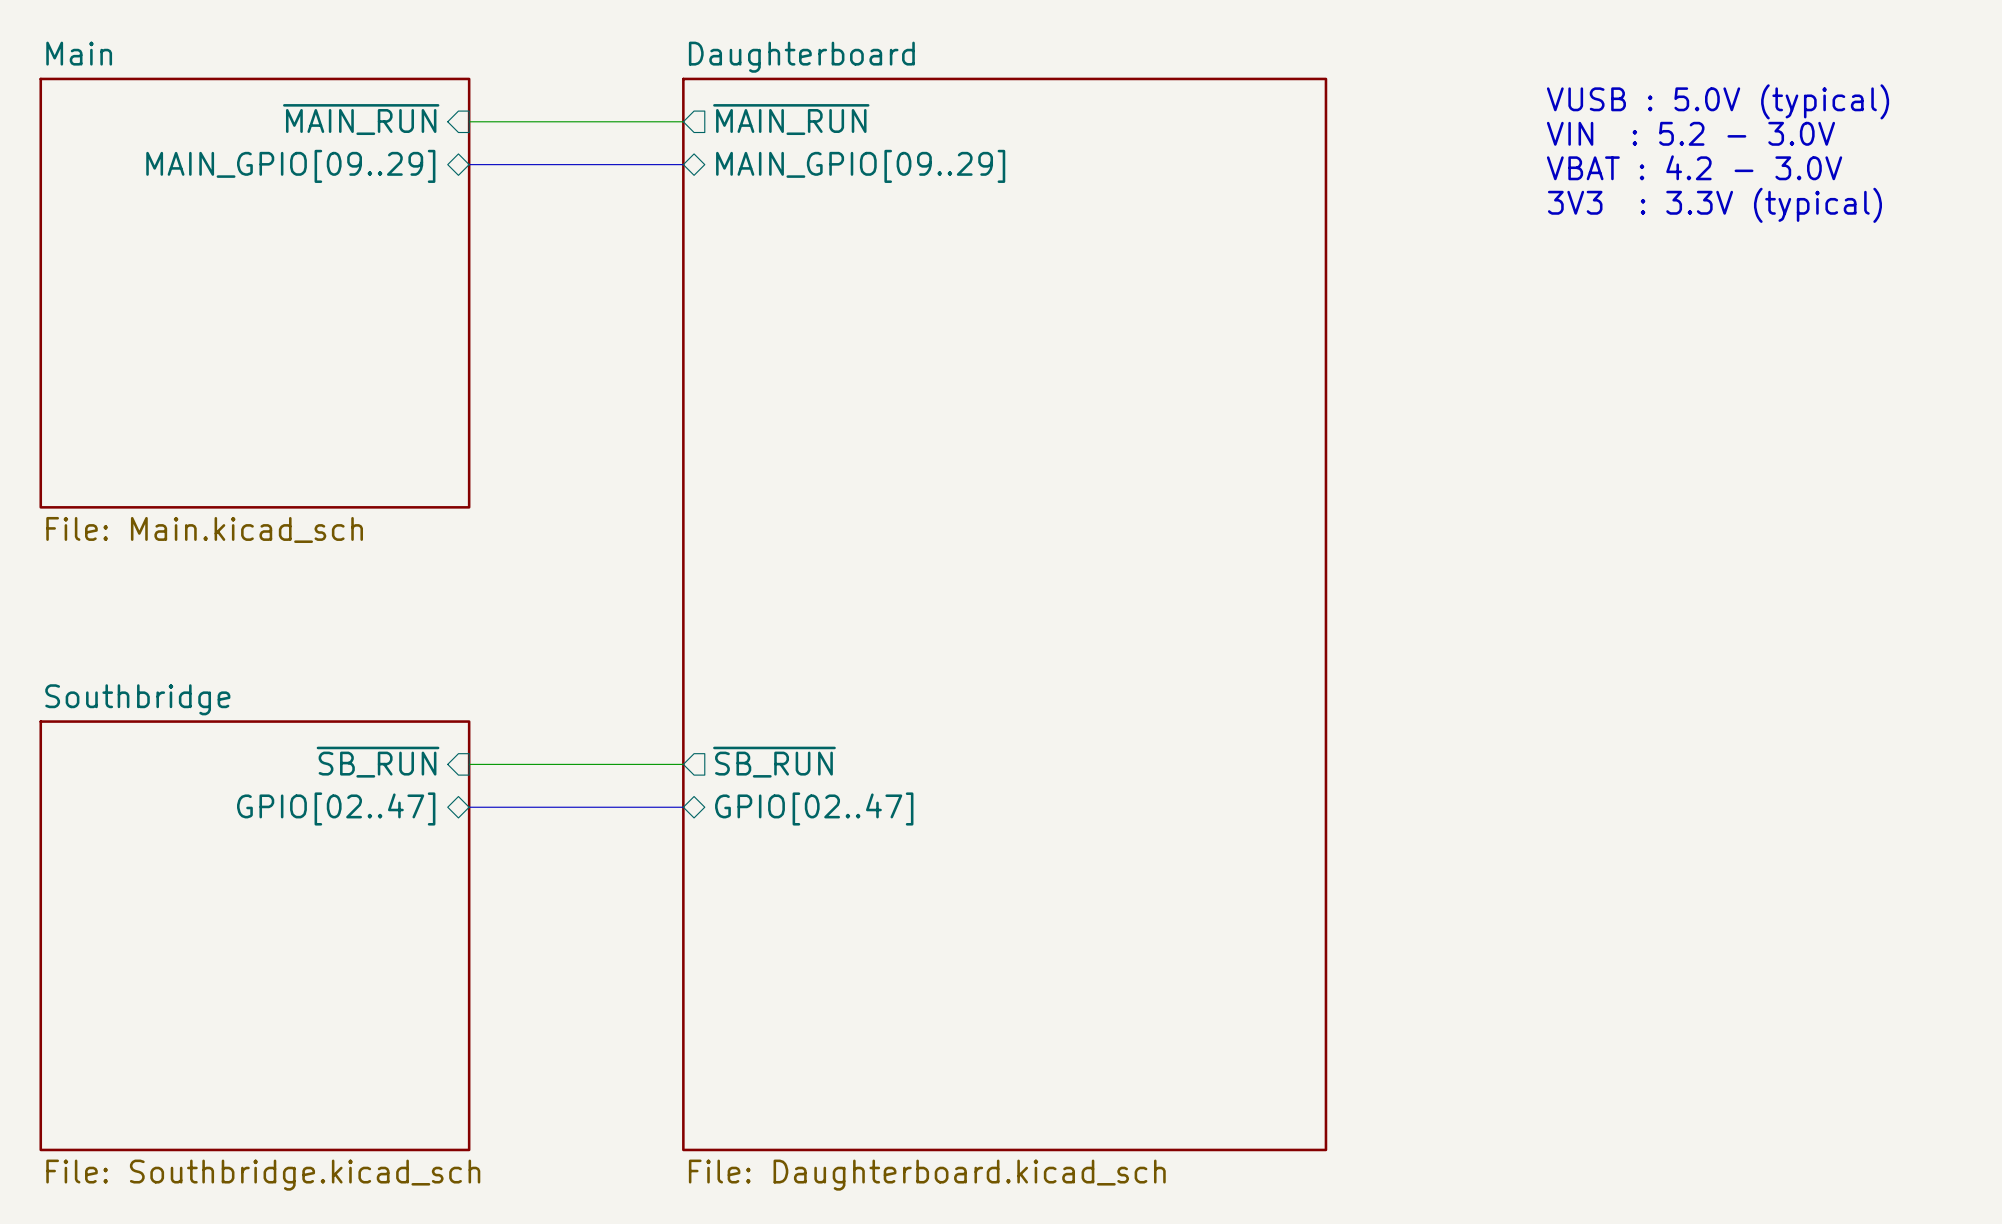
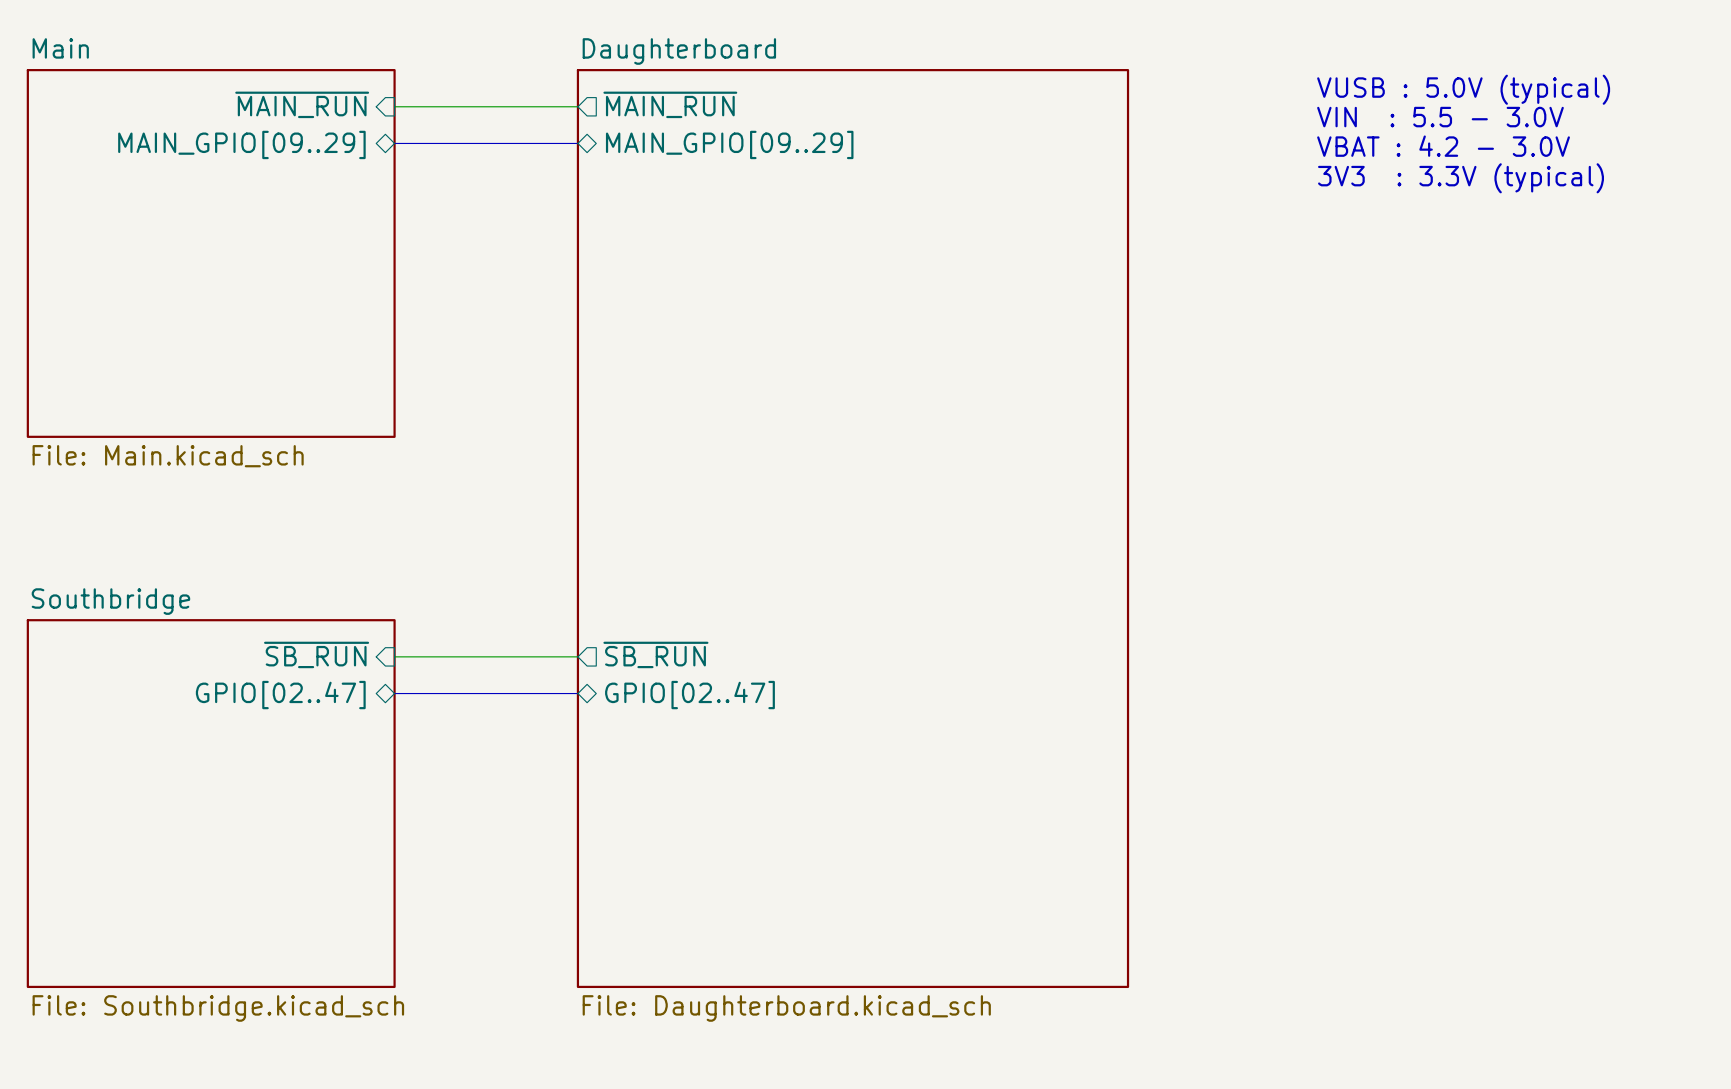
text: VIN : 5.2 - 3.0V (1690, 133) -> VIN : 5.5 - 3.0V (1440, 117)

